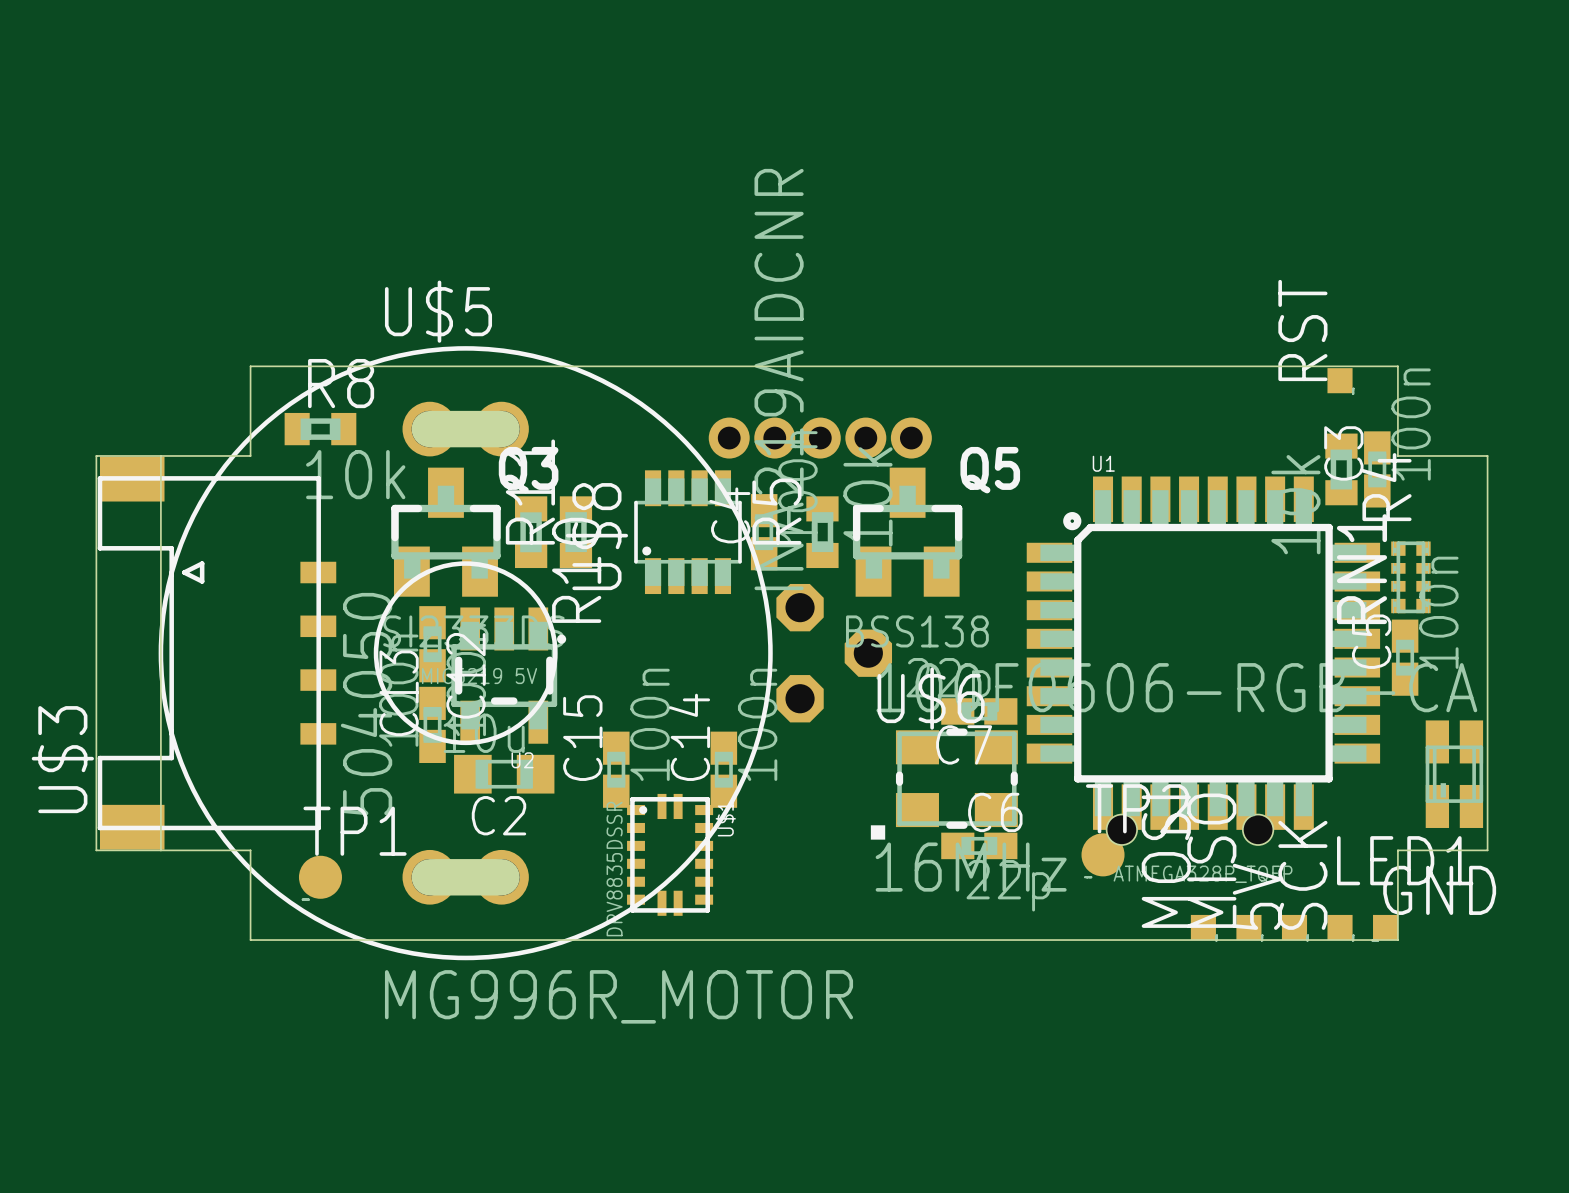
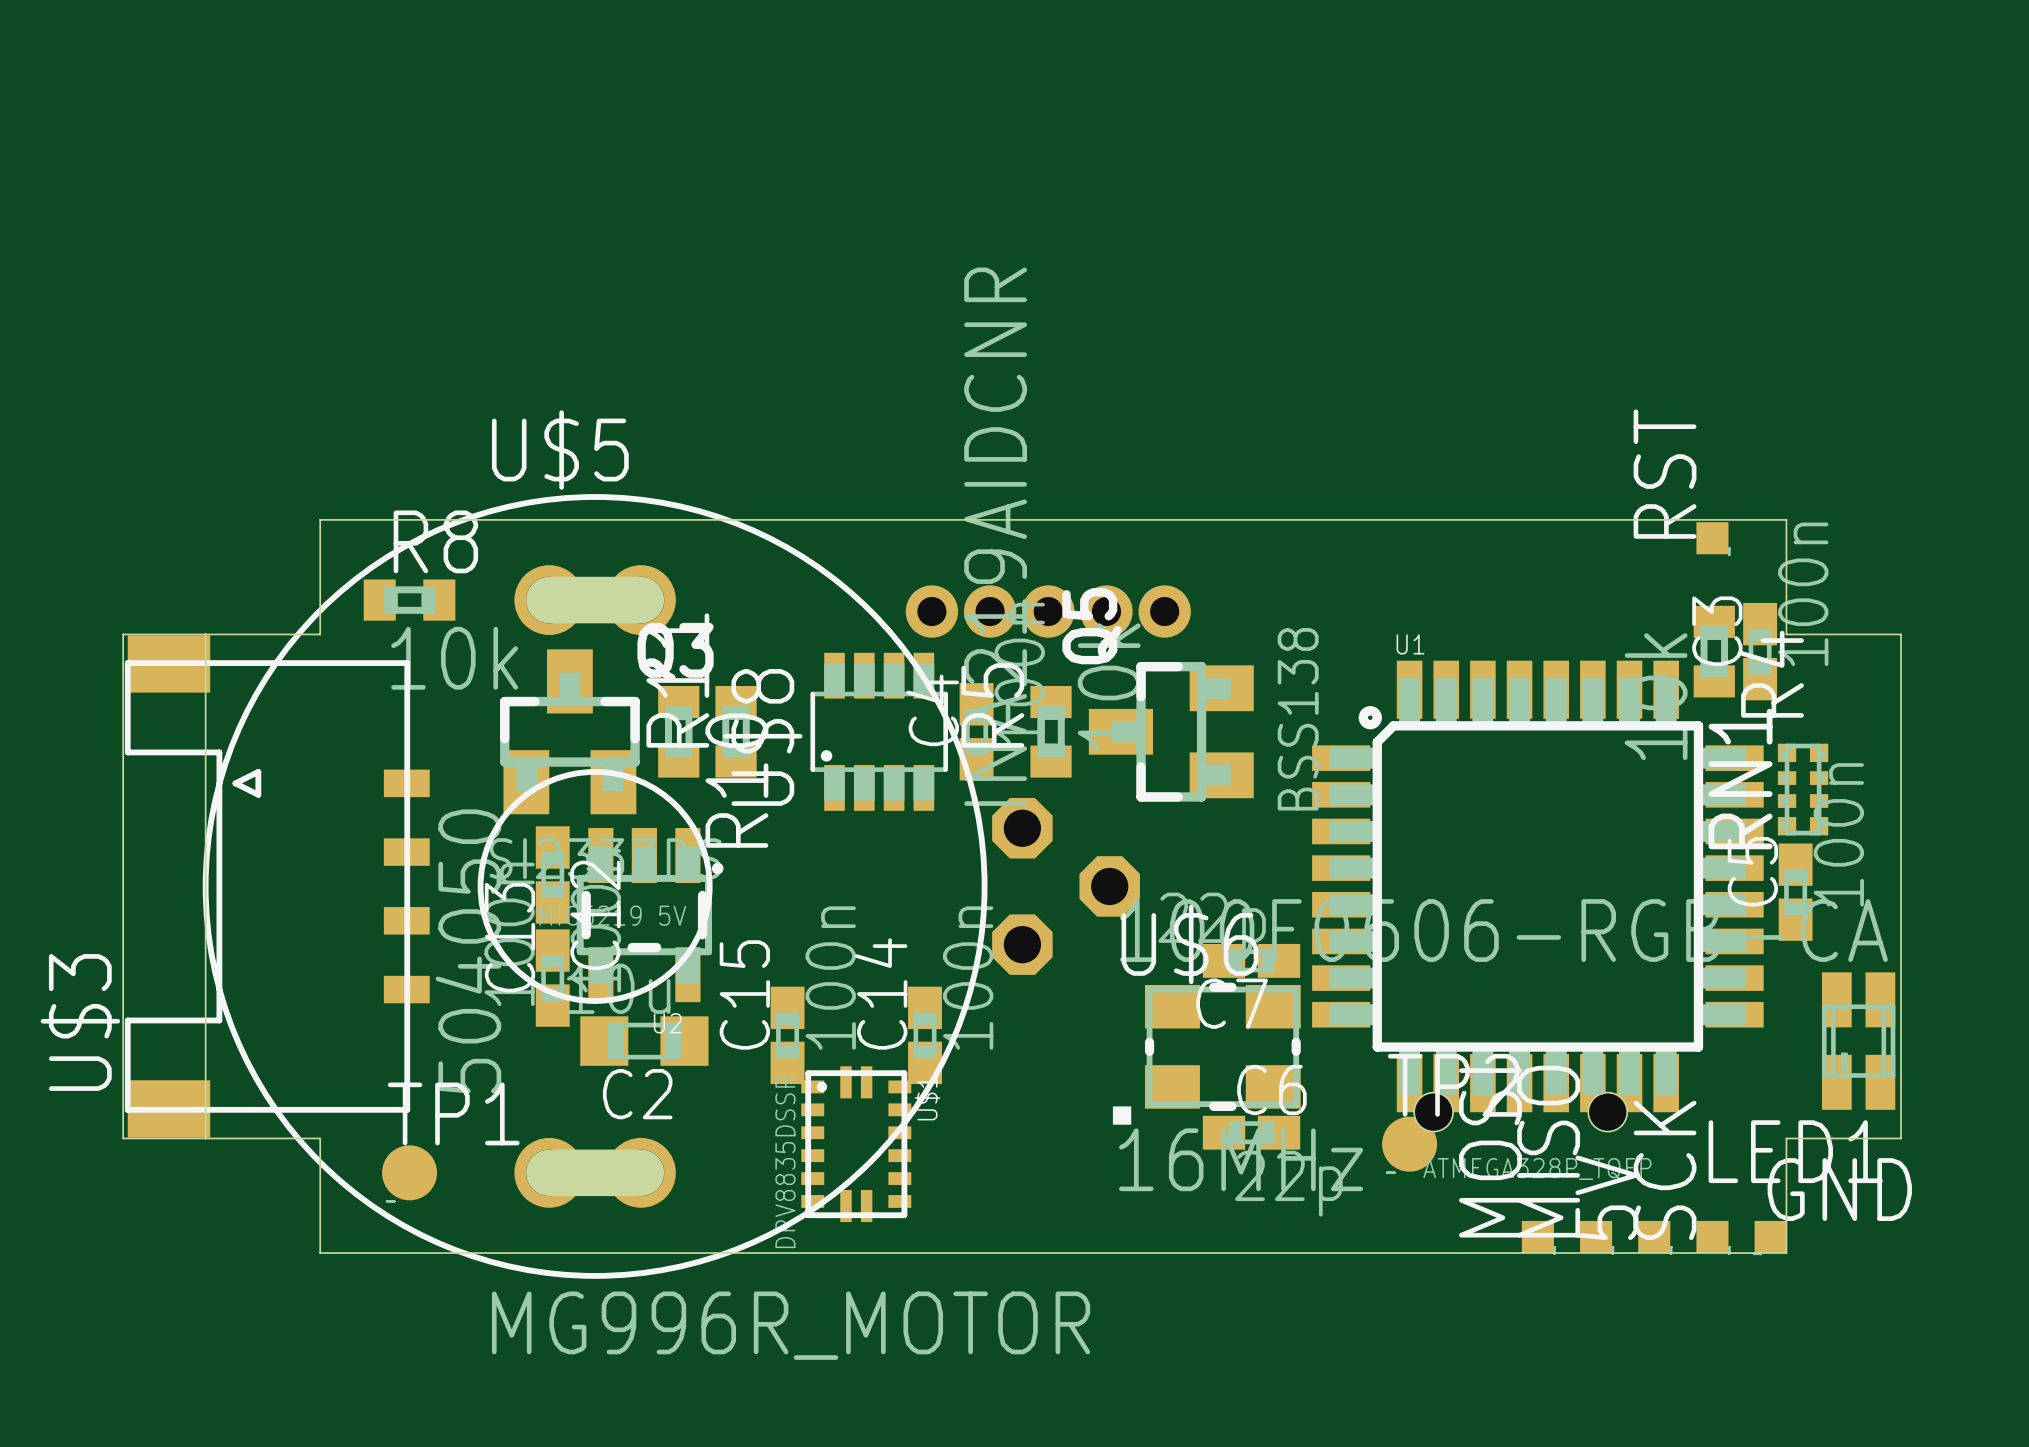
Q5 rotation: 0° (907, 532) -> 90° counterclockwise (1171, 731)

